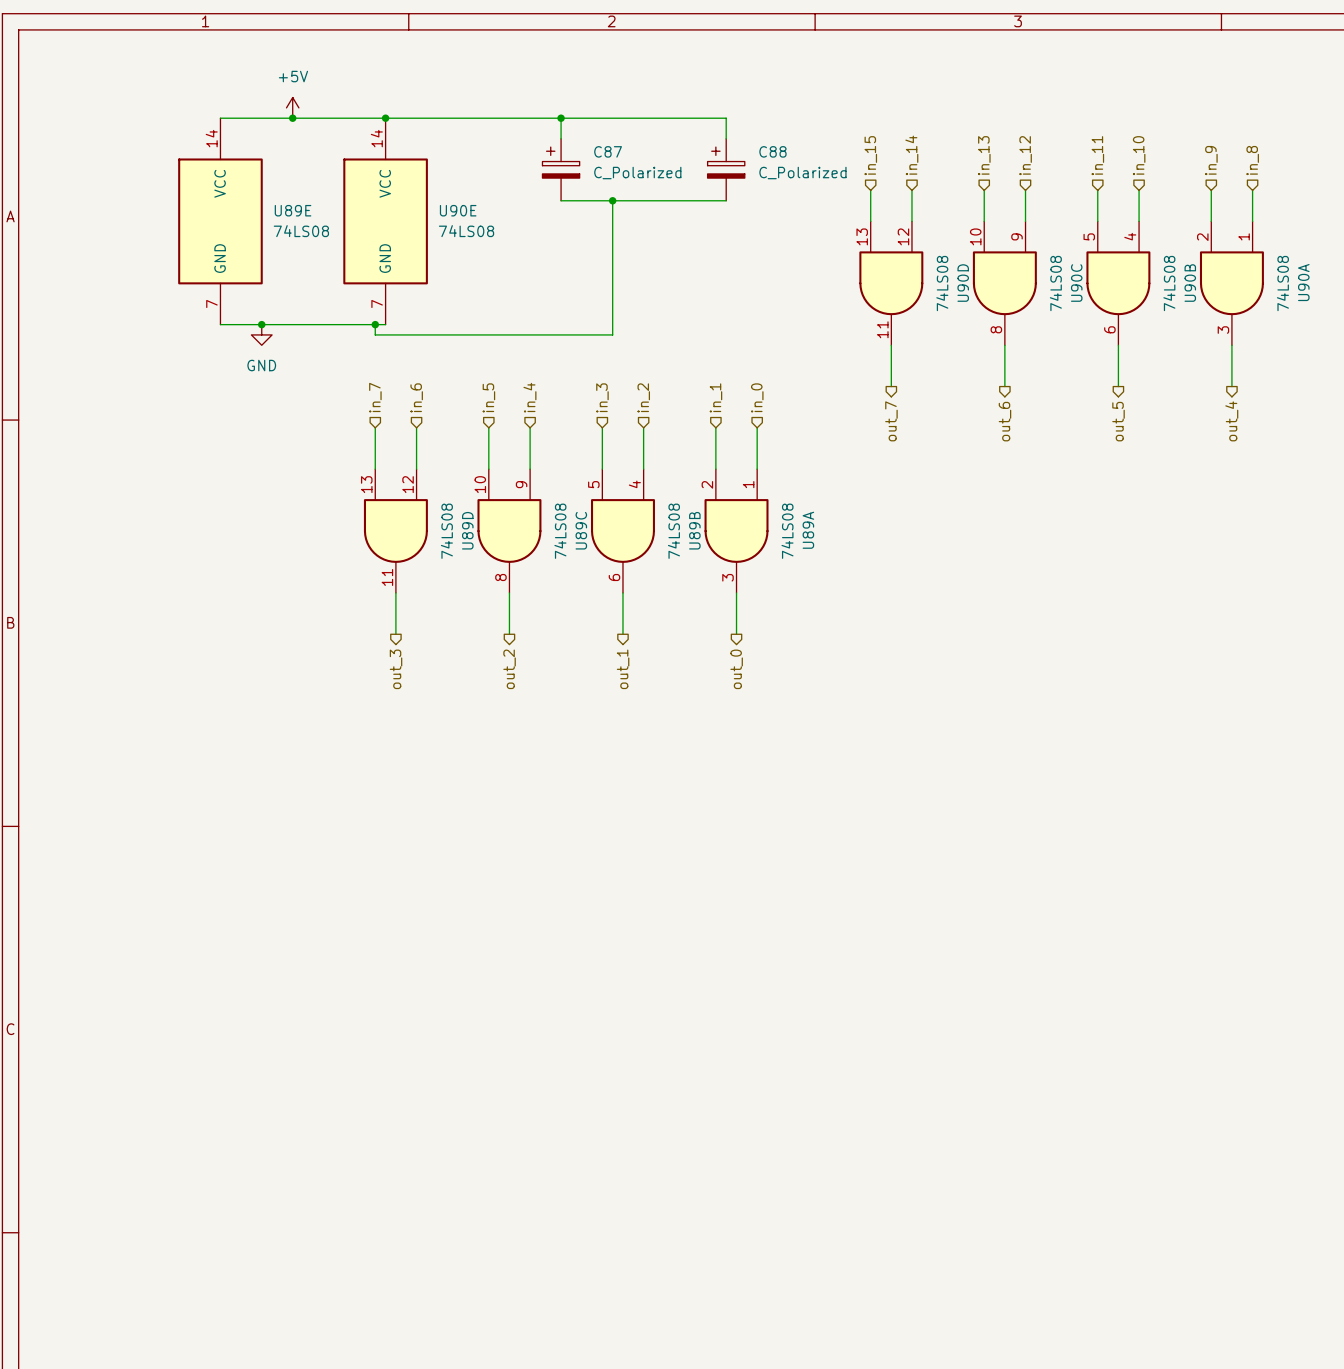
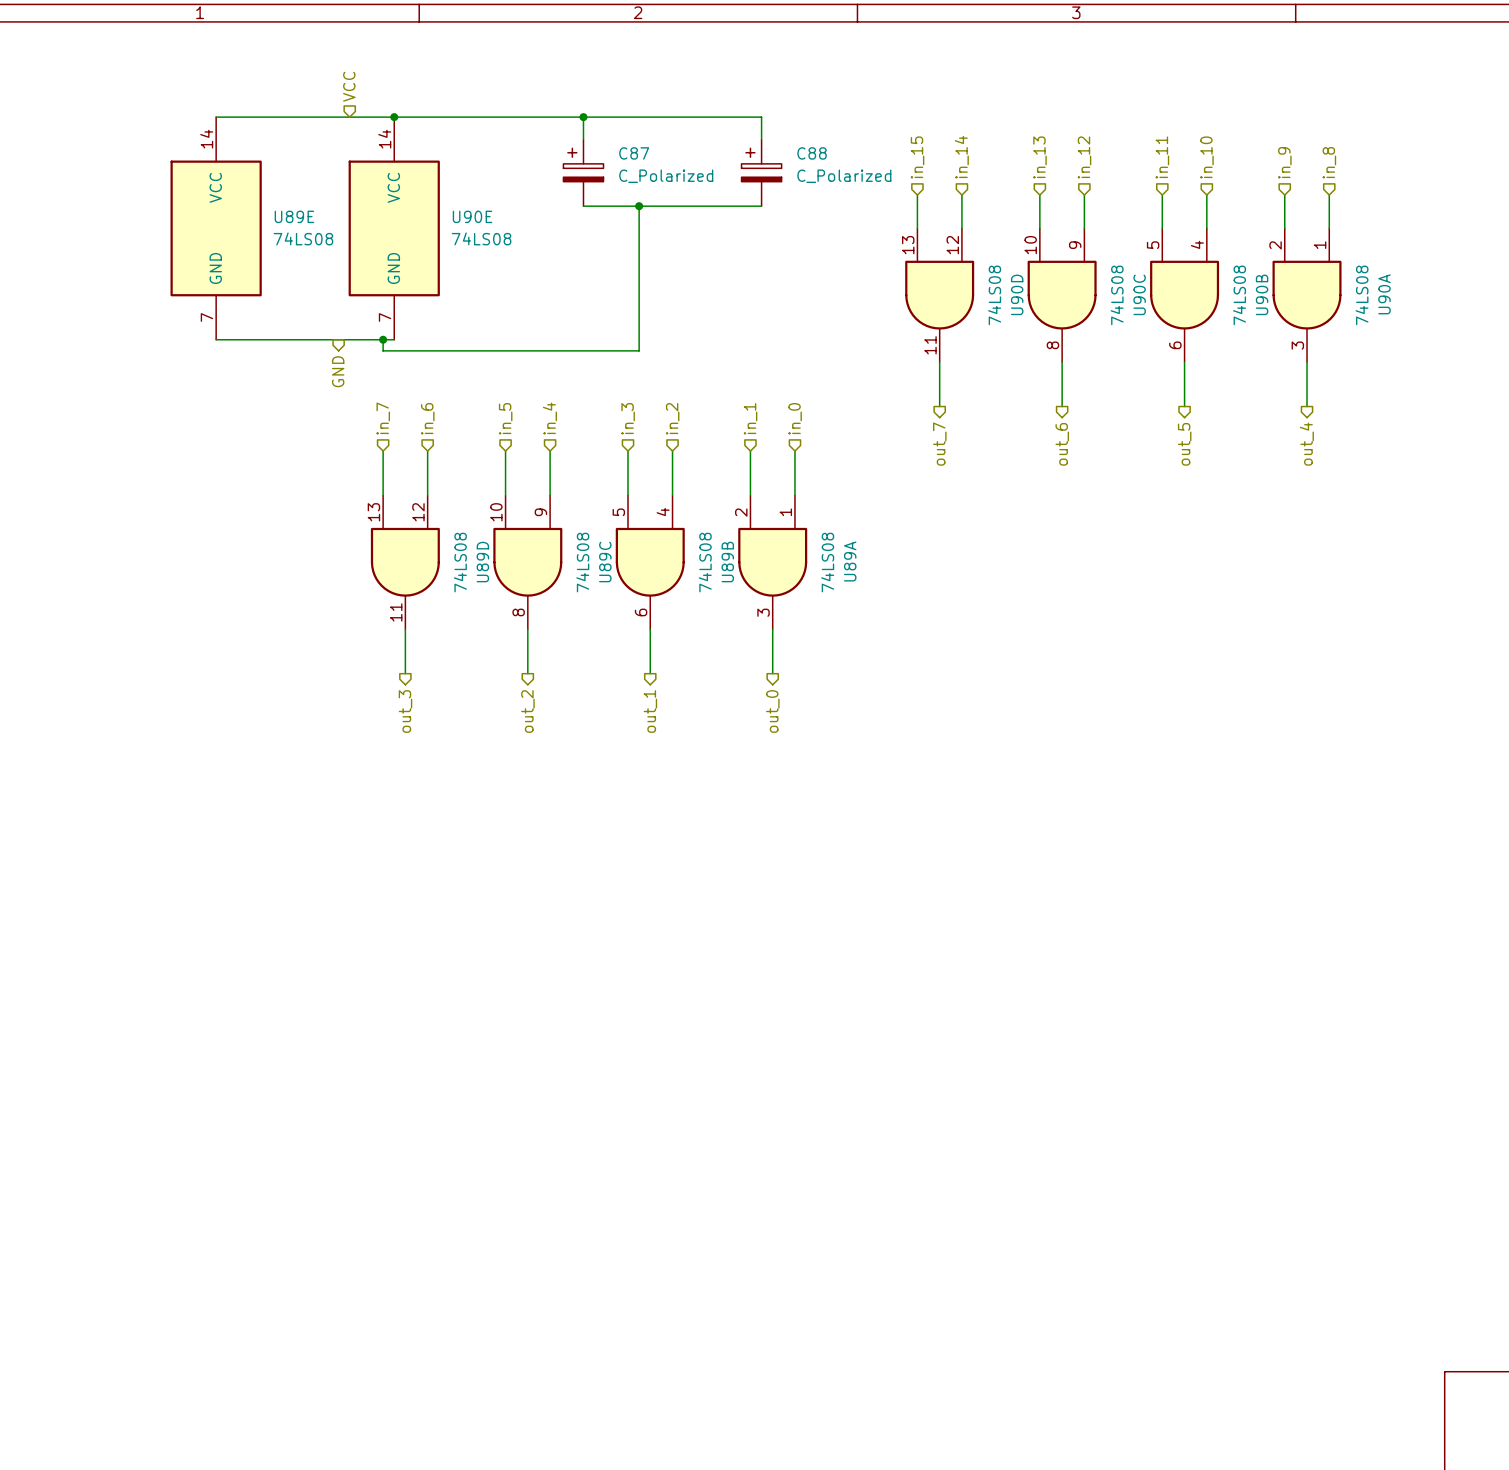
hierarchical label: none -> VCC (349, 86)
power symbol: +5V (292, 107) -> none
junction: (292, 118) -> none
junction: (261, 324) -> none
power symbol: GND (261, 334) -> none
hierarchical label: none -> GND (338, 371)

